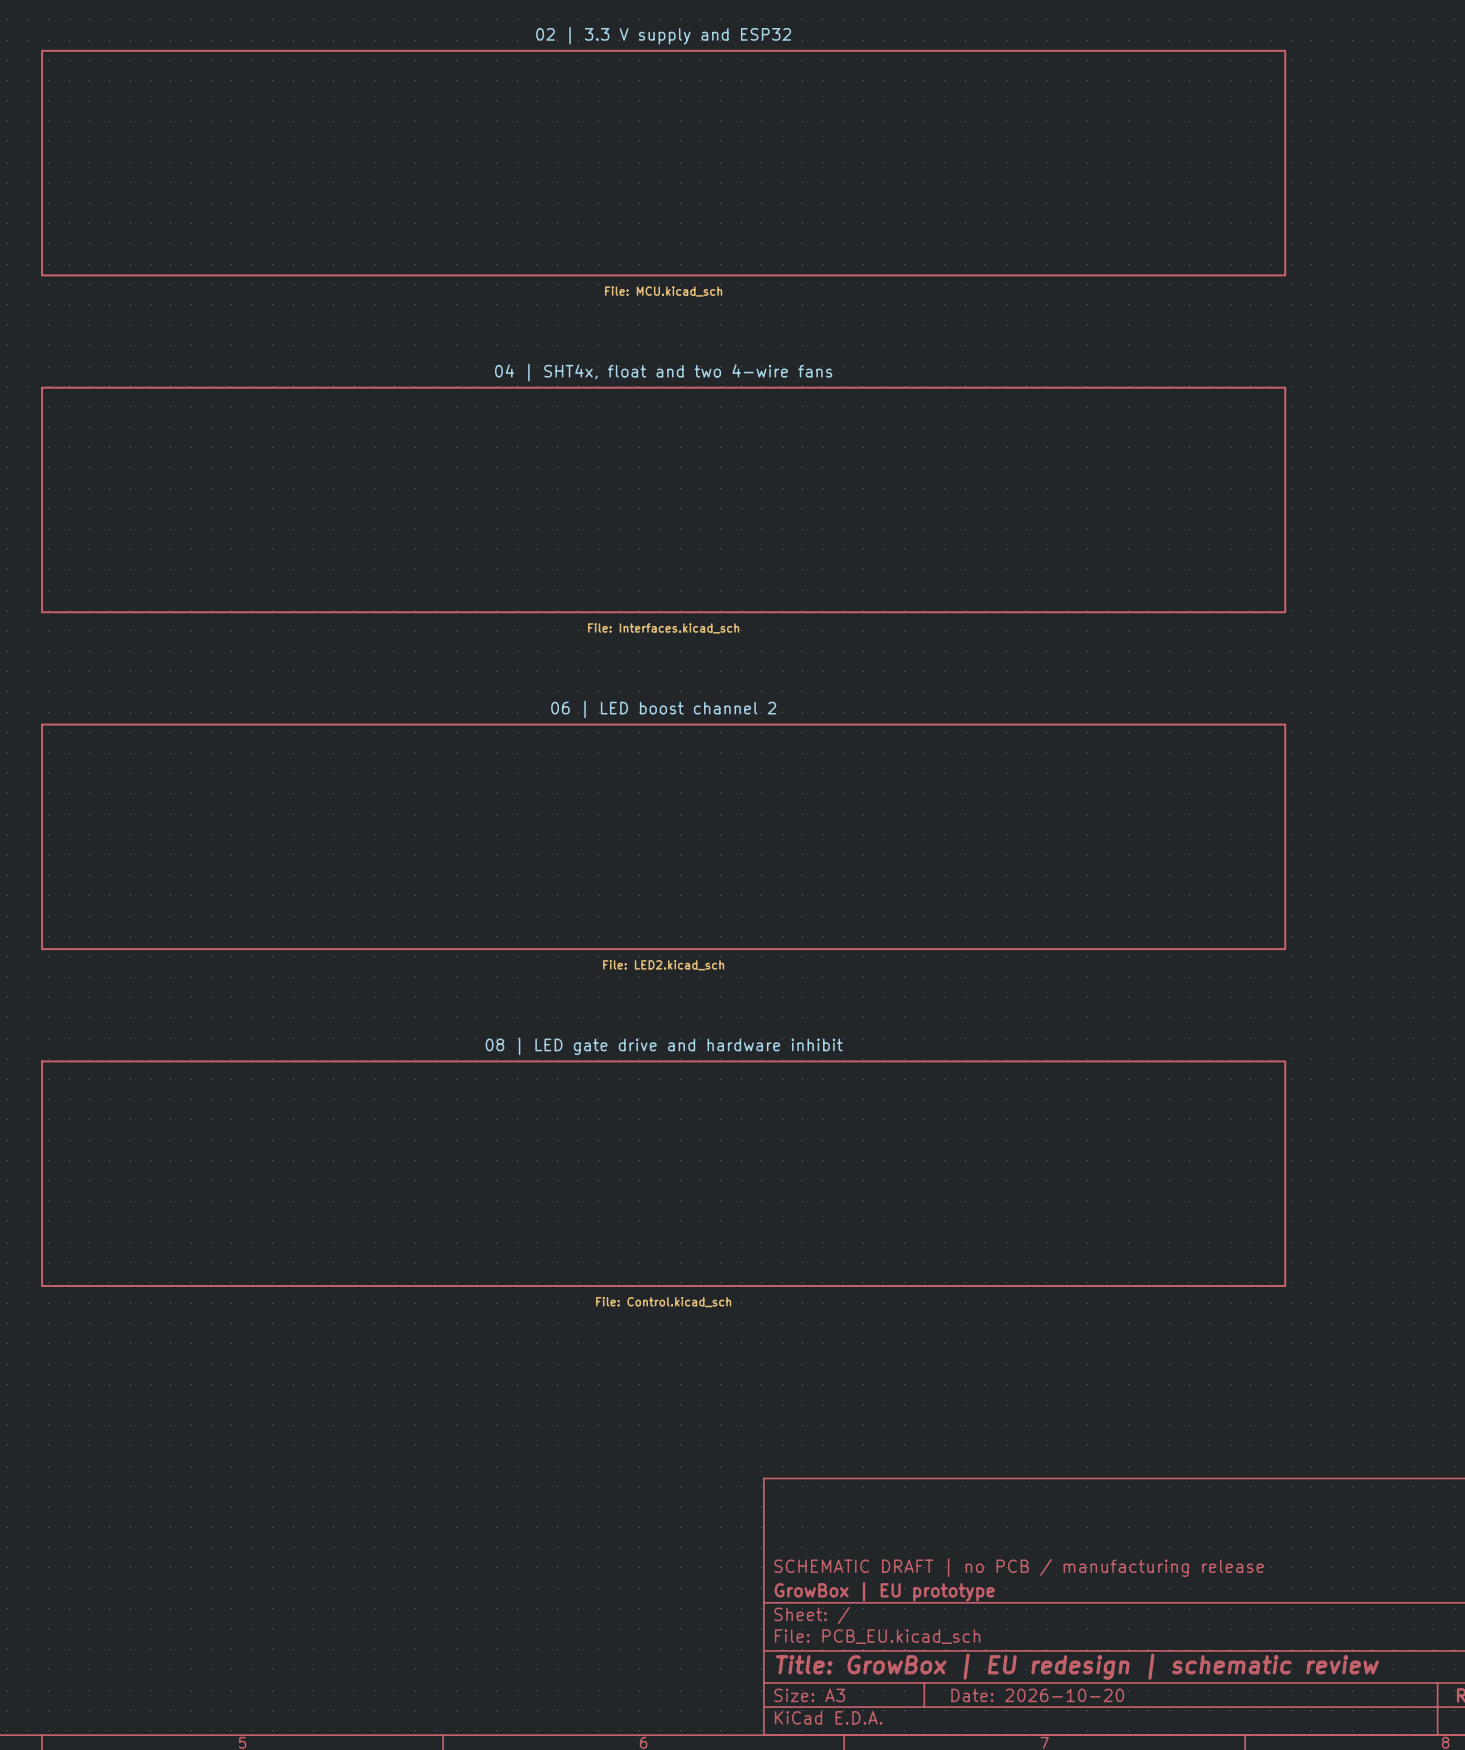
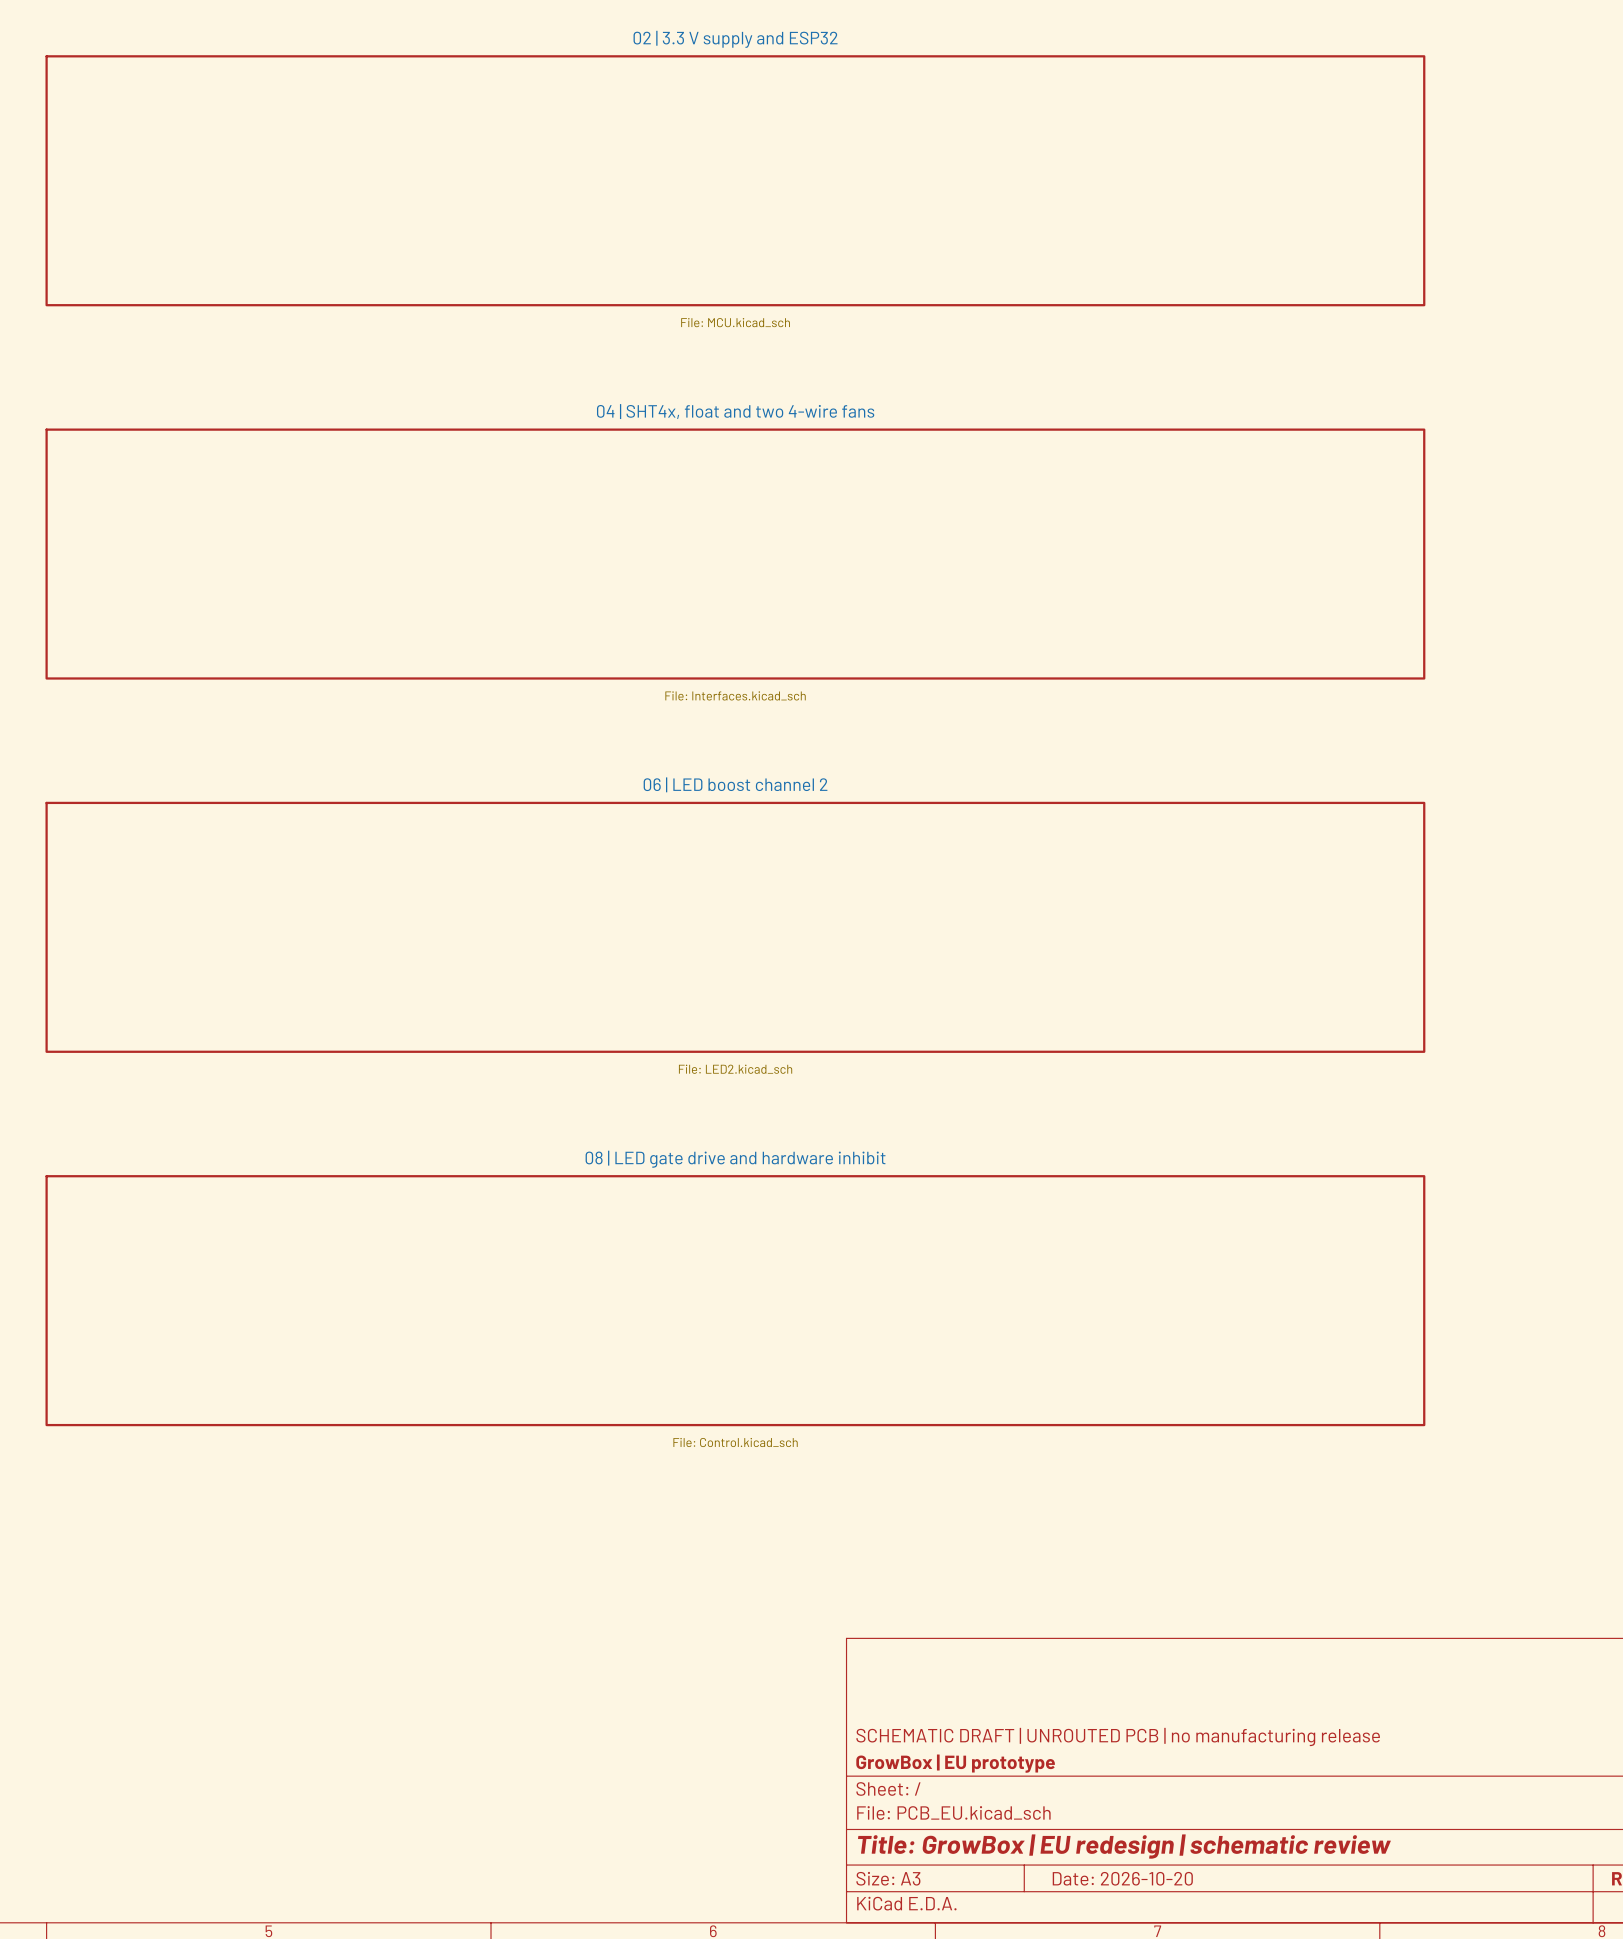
title block: SCHEMATIC DRAFT | no PCB / manufacturing release (1019, 1567) -> SCHEMATIC DRAFT | UNROUTED PCB | no manufacturing release (1118, 1736)

